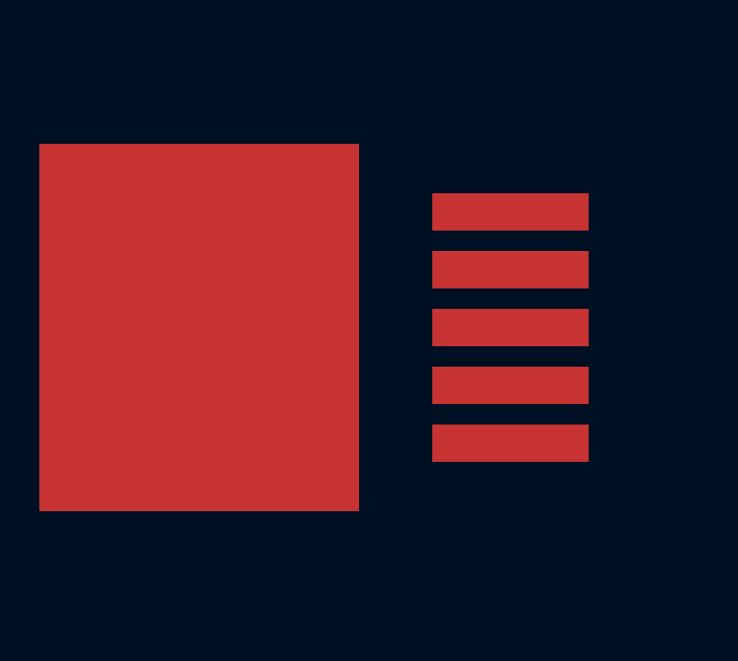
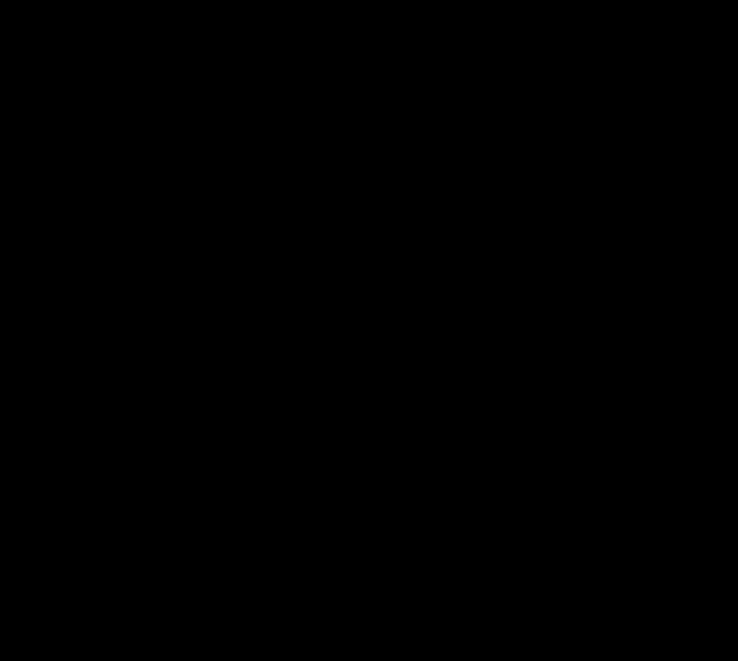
part: (314, 327) -> none

